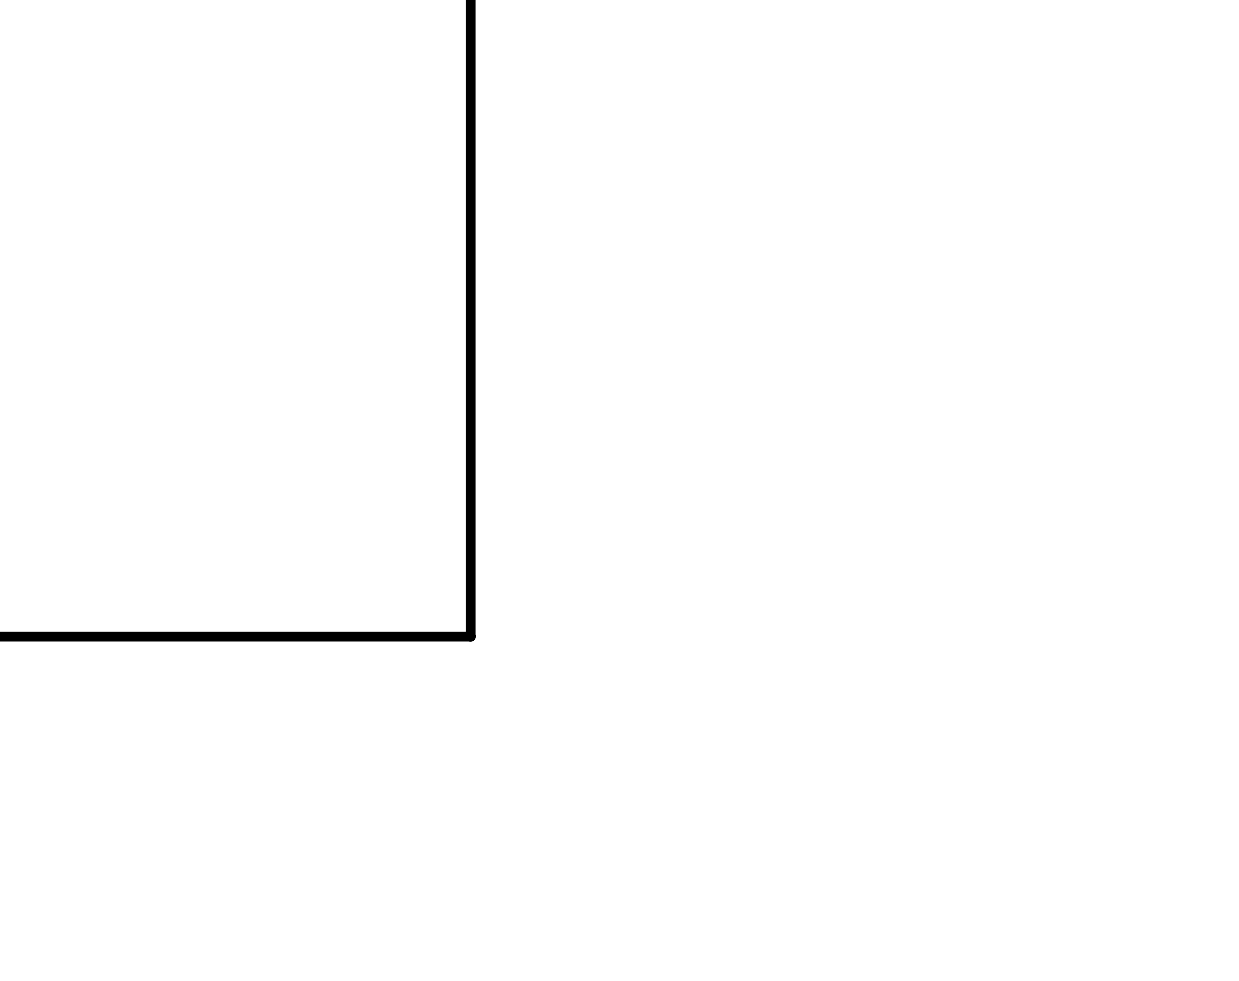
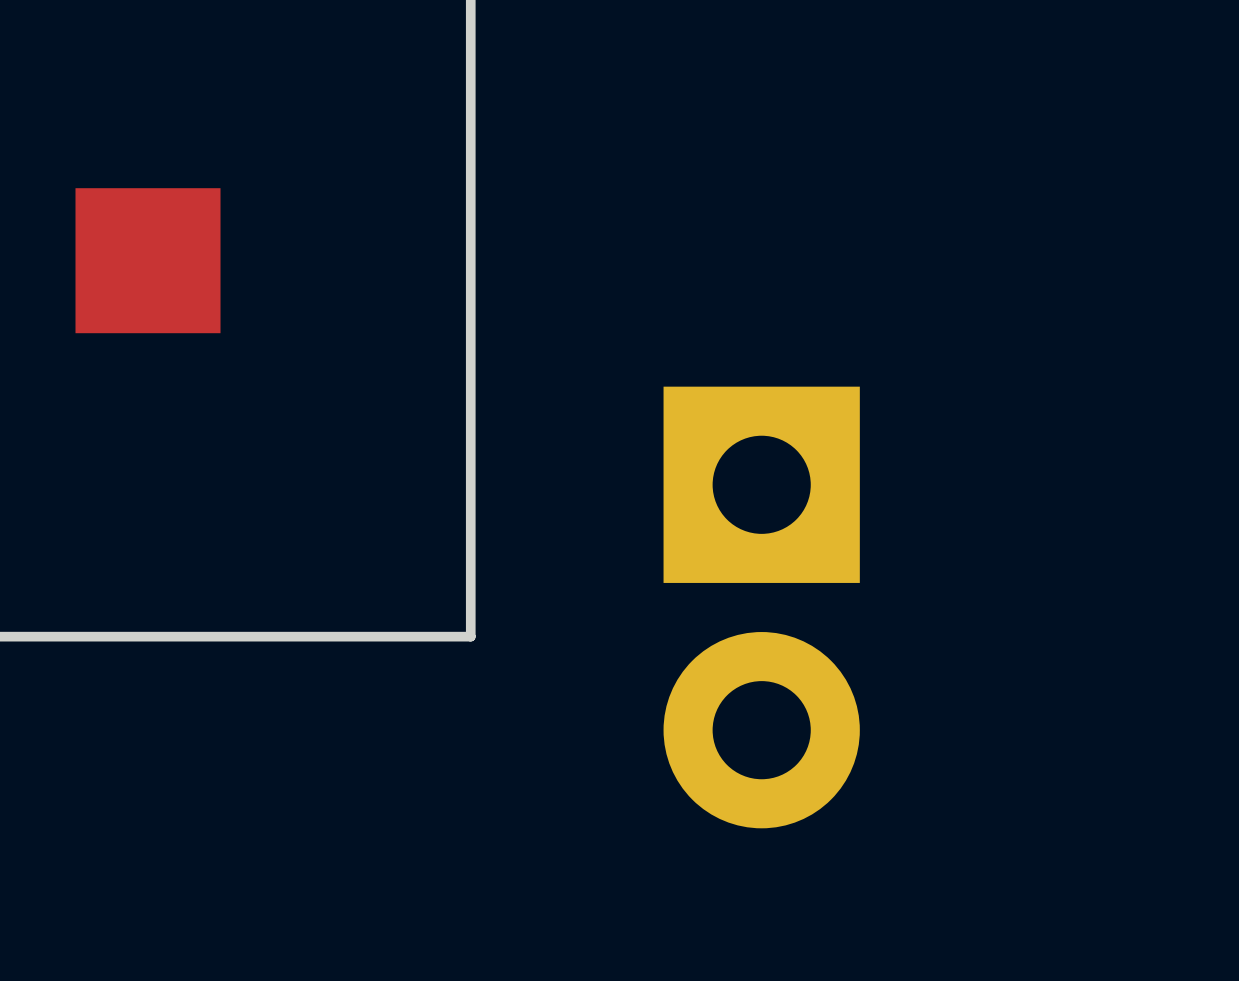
part: none -> (148, 260)
part: none -> (761, 607)

